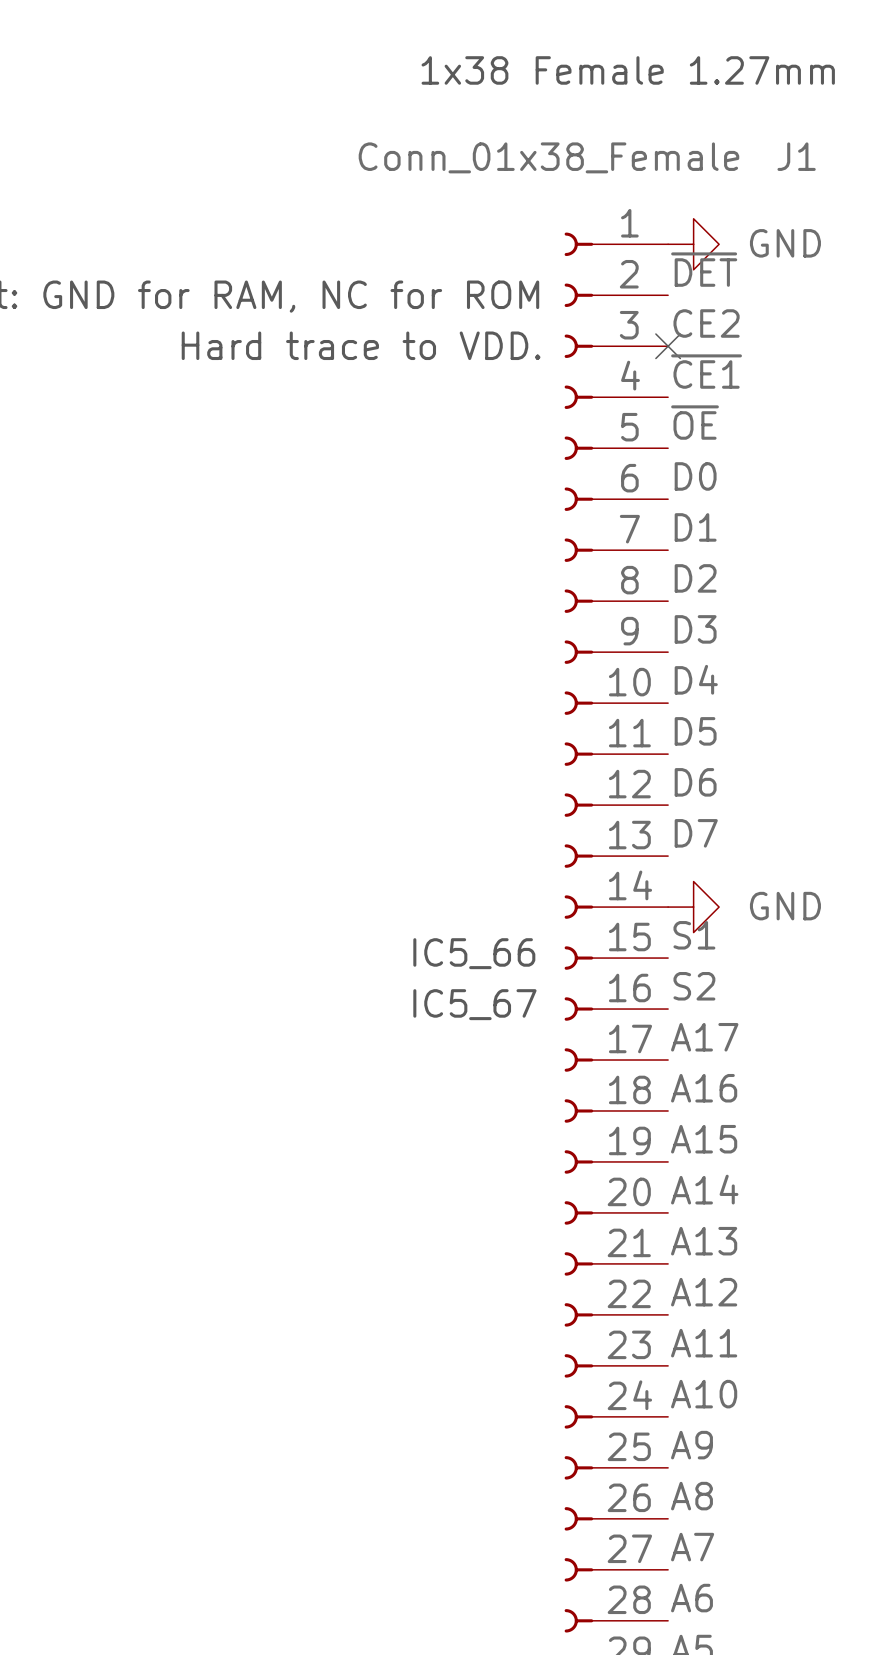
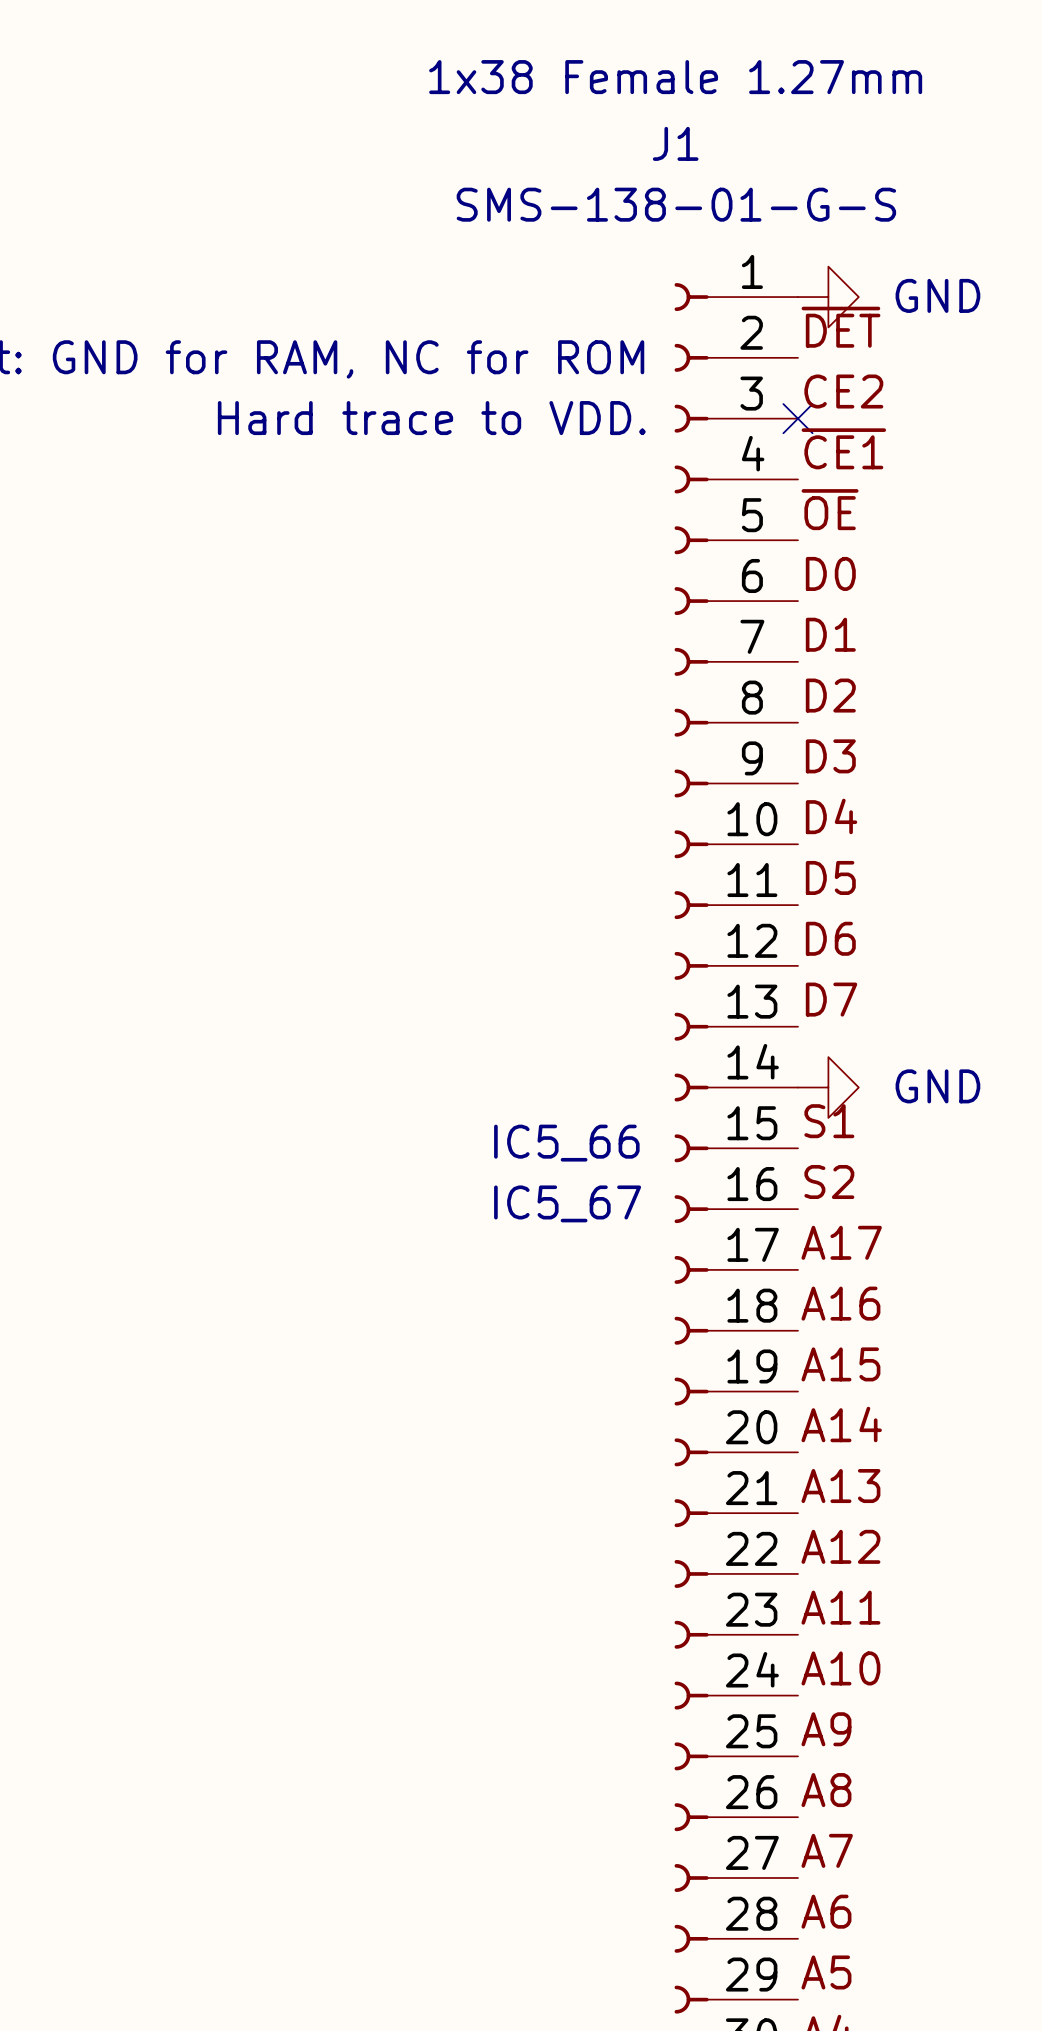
text position: 1x38 Female 1.27mm (628, 70) -> 1x38 Female 1.27mm (675, 77)
J1 name position: J1 (796, 156) -> J1 (675, 143)
J1 value: Conn_01x38_Female (548, 157) -> SMS-138-01-G-S (676, 204)

